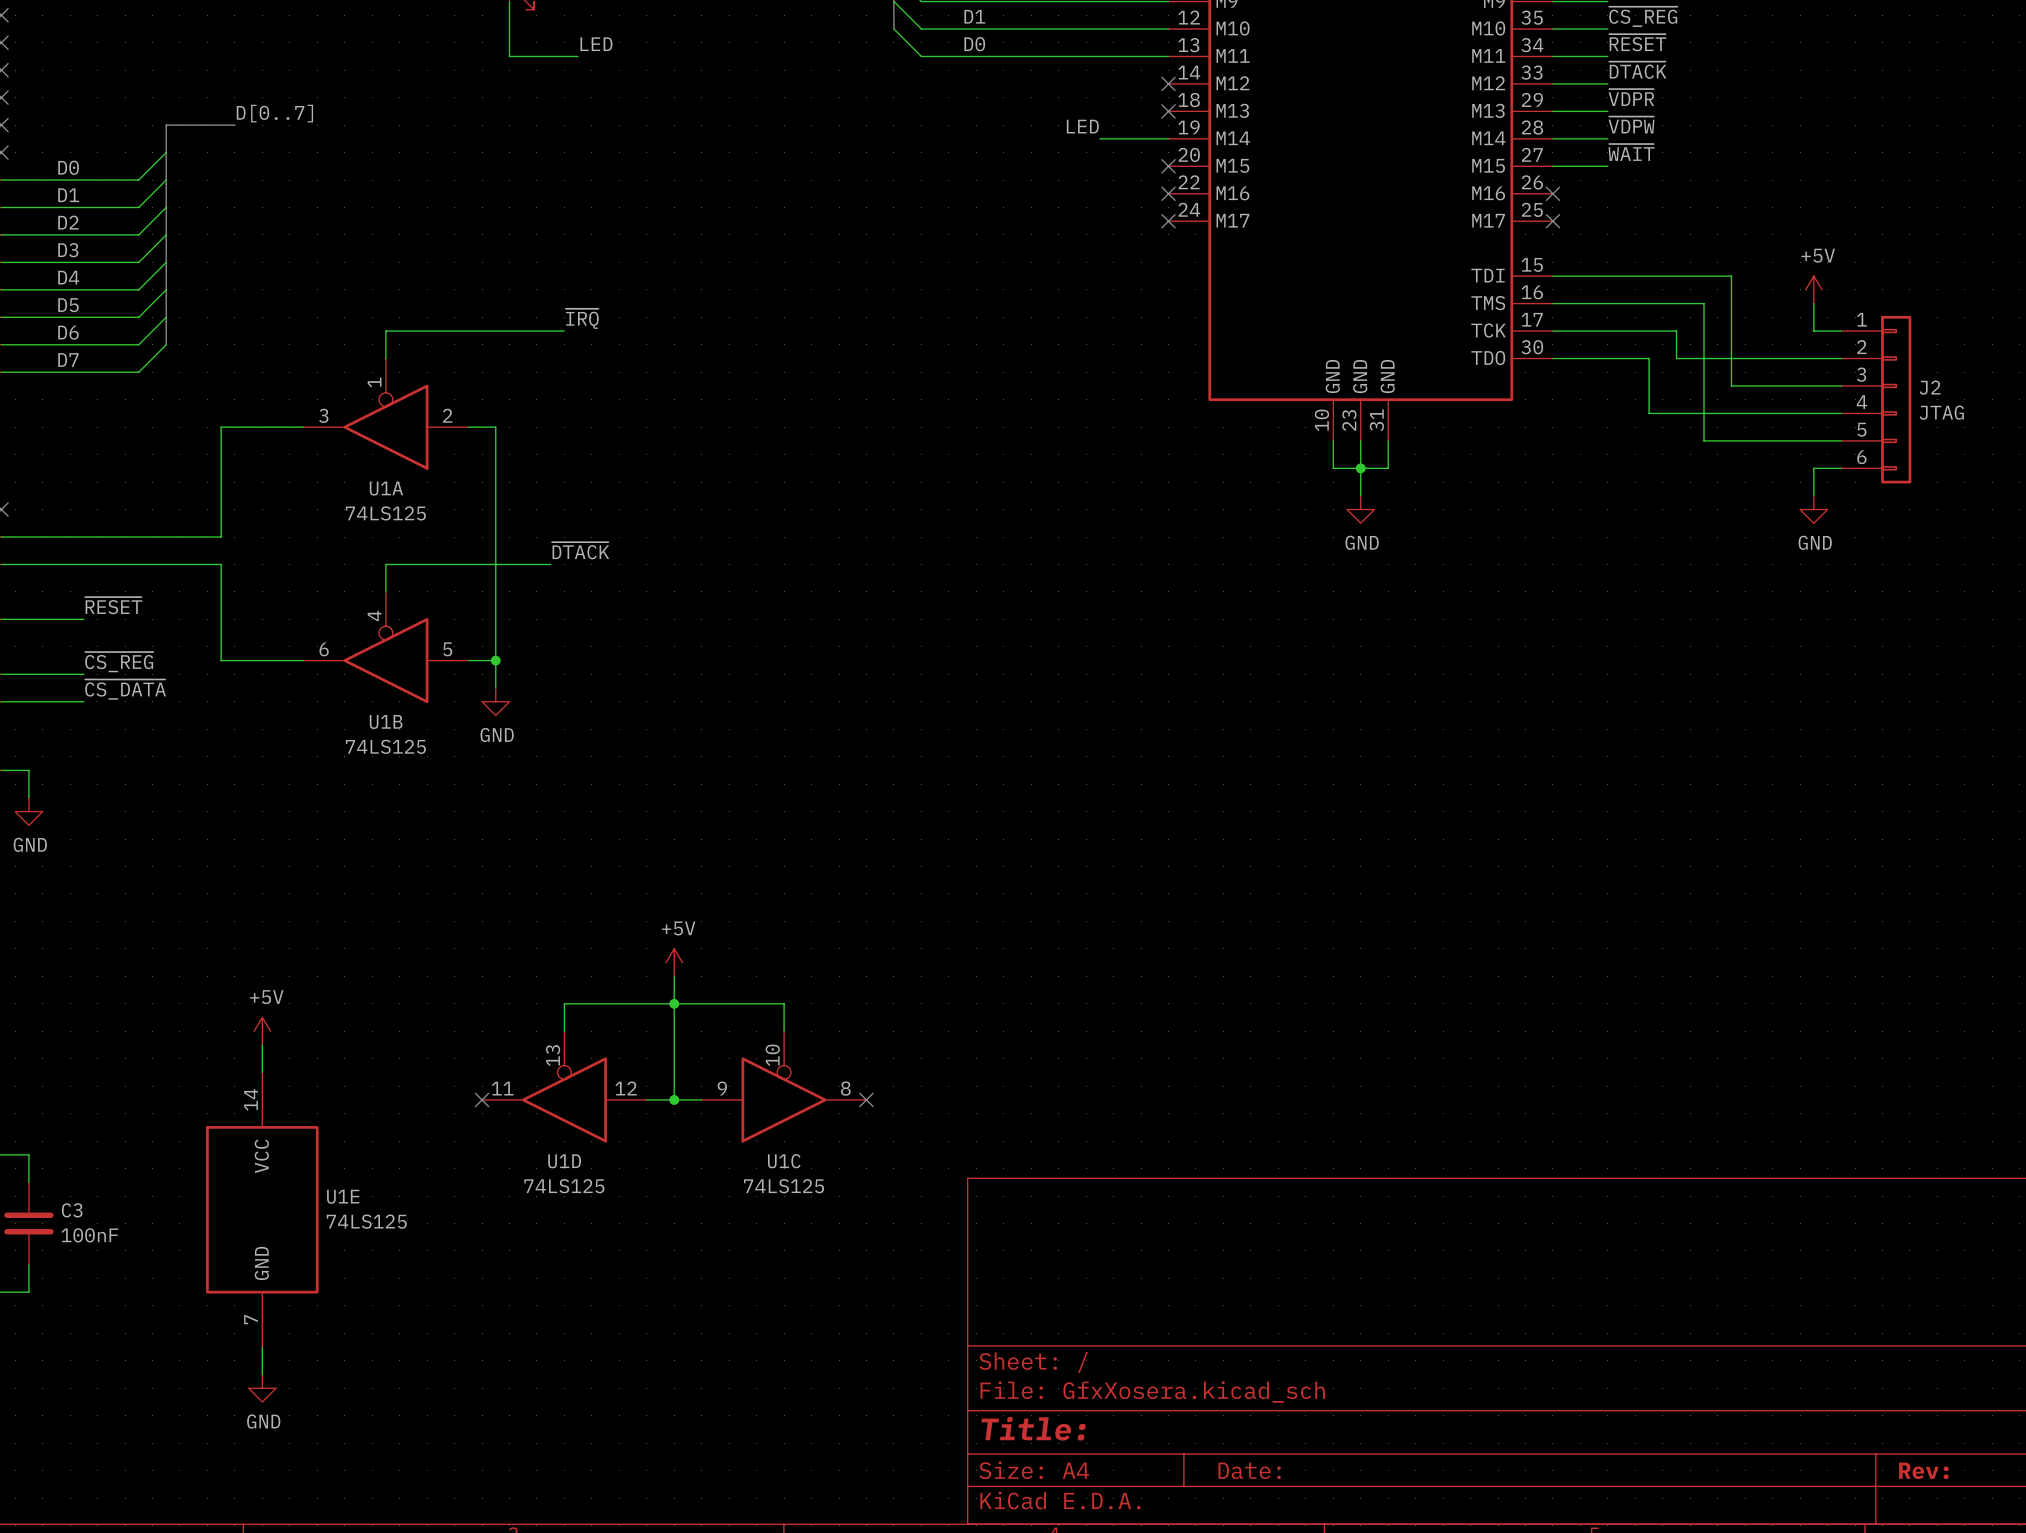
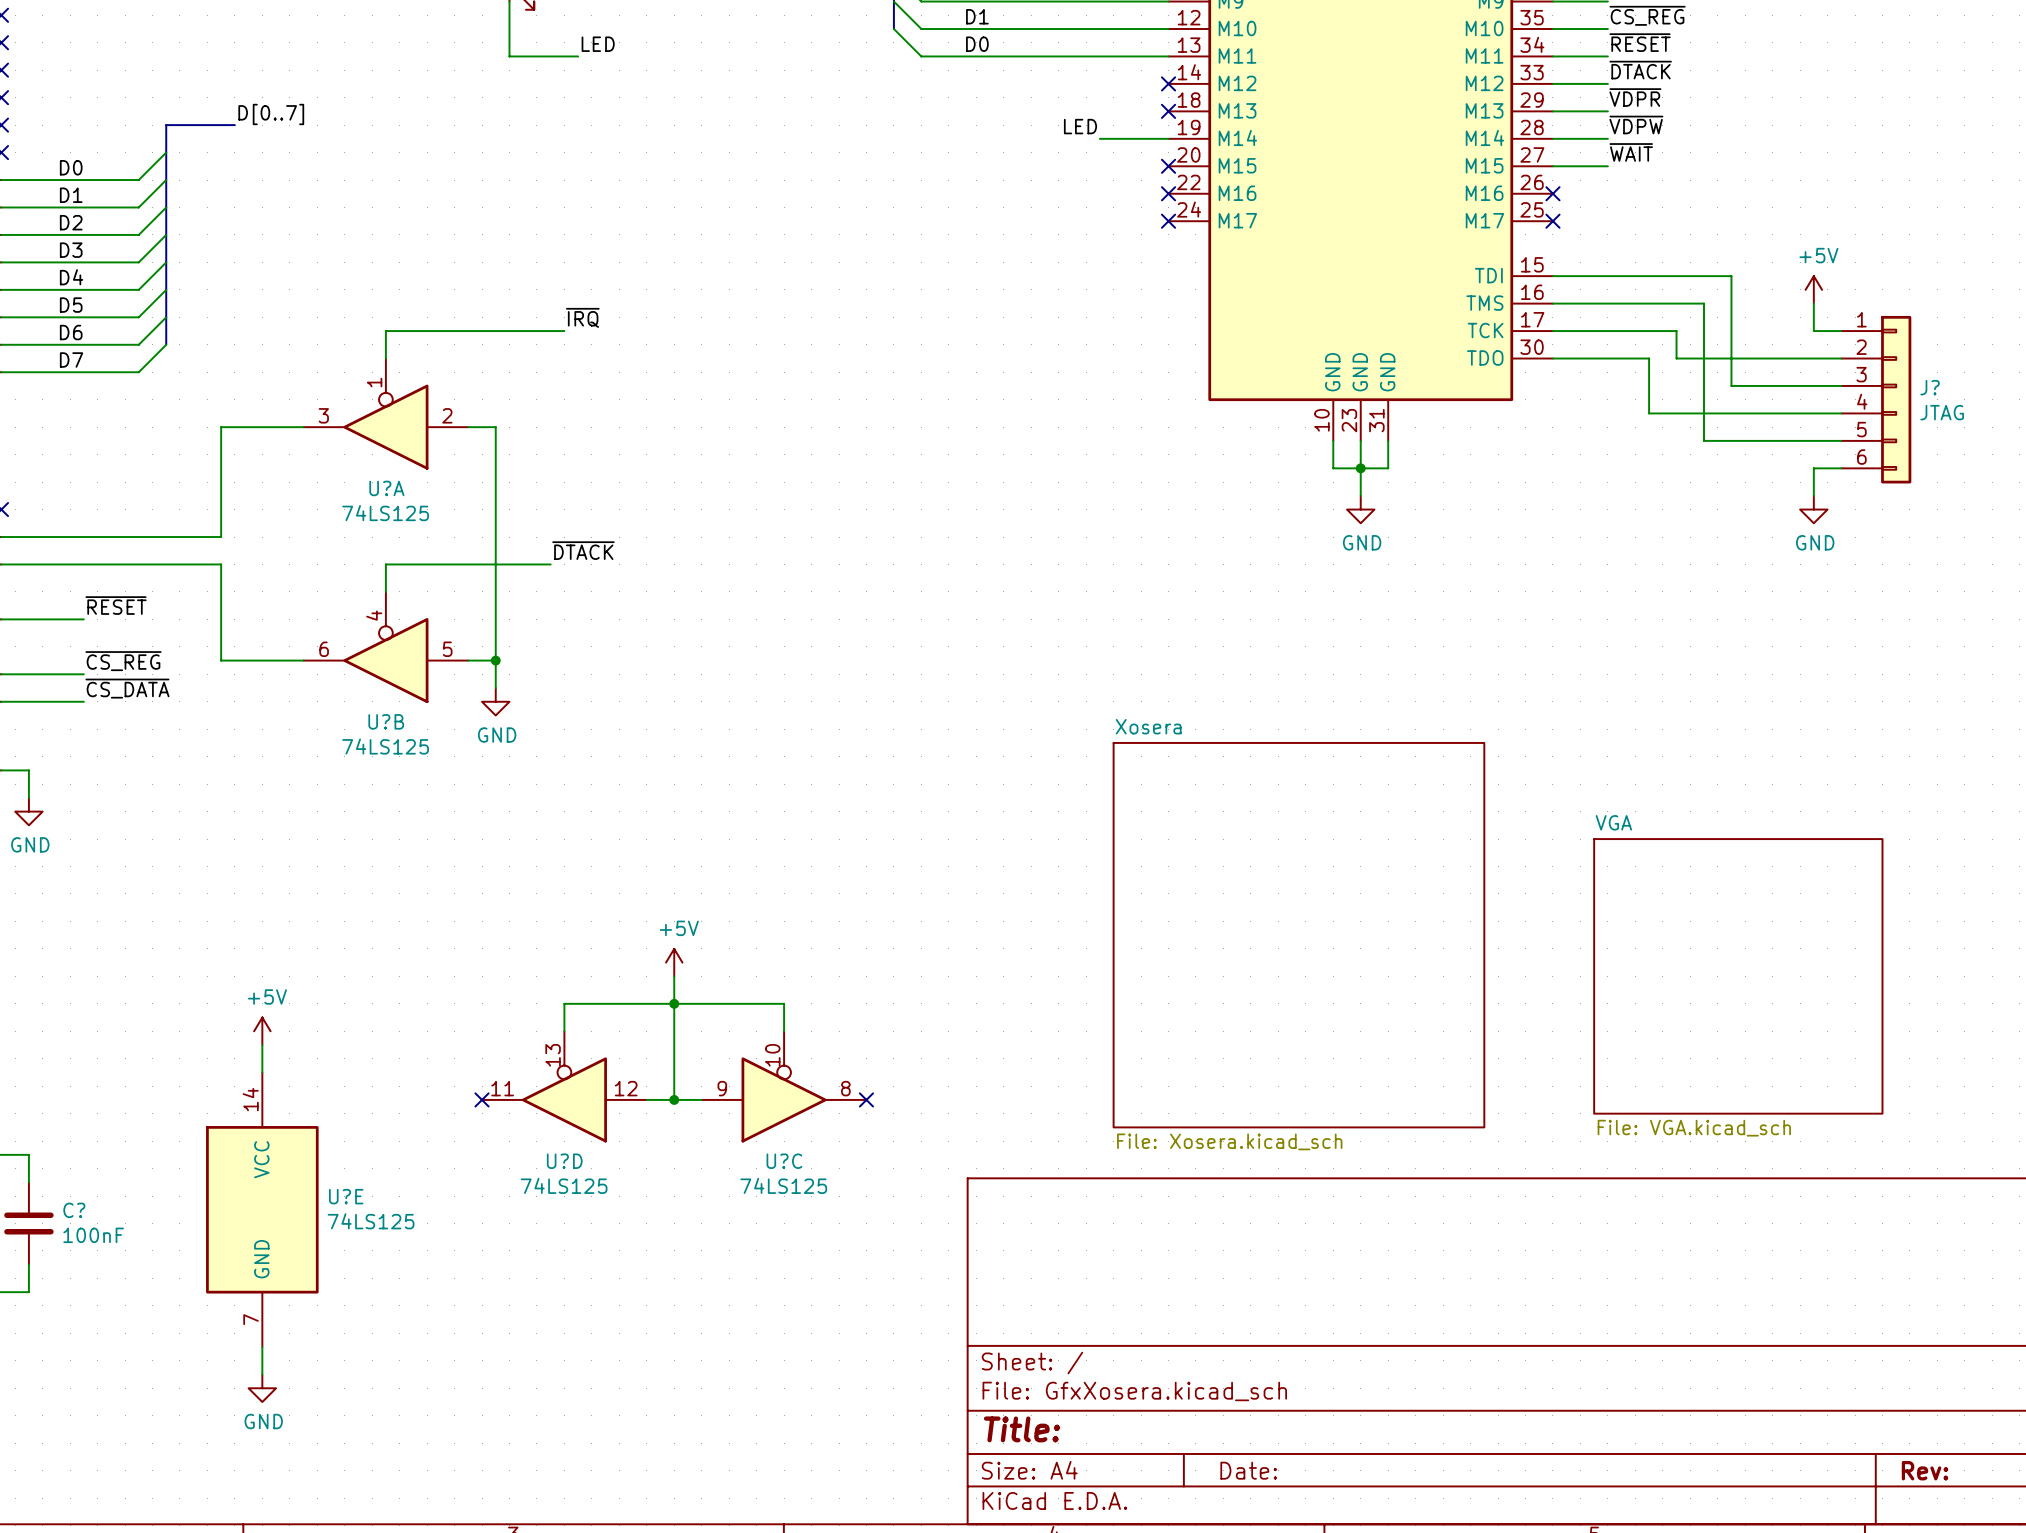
J2 name: J2 (1930, 387) -> J? (1930, 387)
U1A name: U1A (386, 488) -> U?A (386, 488)
U1B name: U1B (386, 721) -> U?B (386, 721)
sheet Xosera: none -> File: Xosera.kicad_sch (1298, 935)
sheet VGA: none -> File: VGA.kicad_sch (1738, 976)
U1D name: U1D (564, 1161) -> U?D (564, 1161)
U1C name: U1C (784, 1161) -> U?C (784, 1161)
U1E name: U1E (343, 1196) -> U?E (346, 1196)
C3 name: C3 (72, 1210) -> C? (74, 1210)

